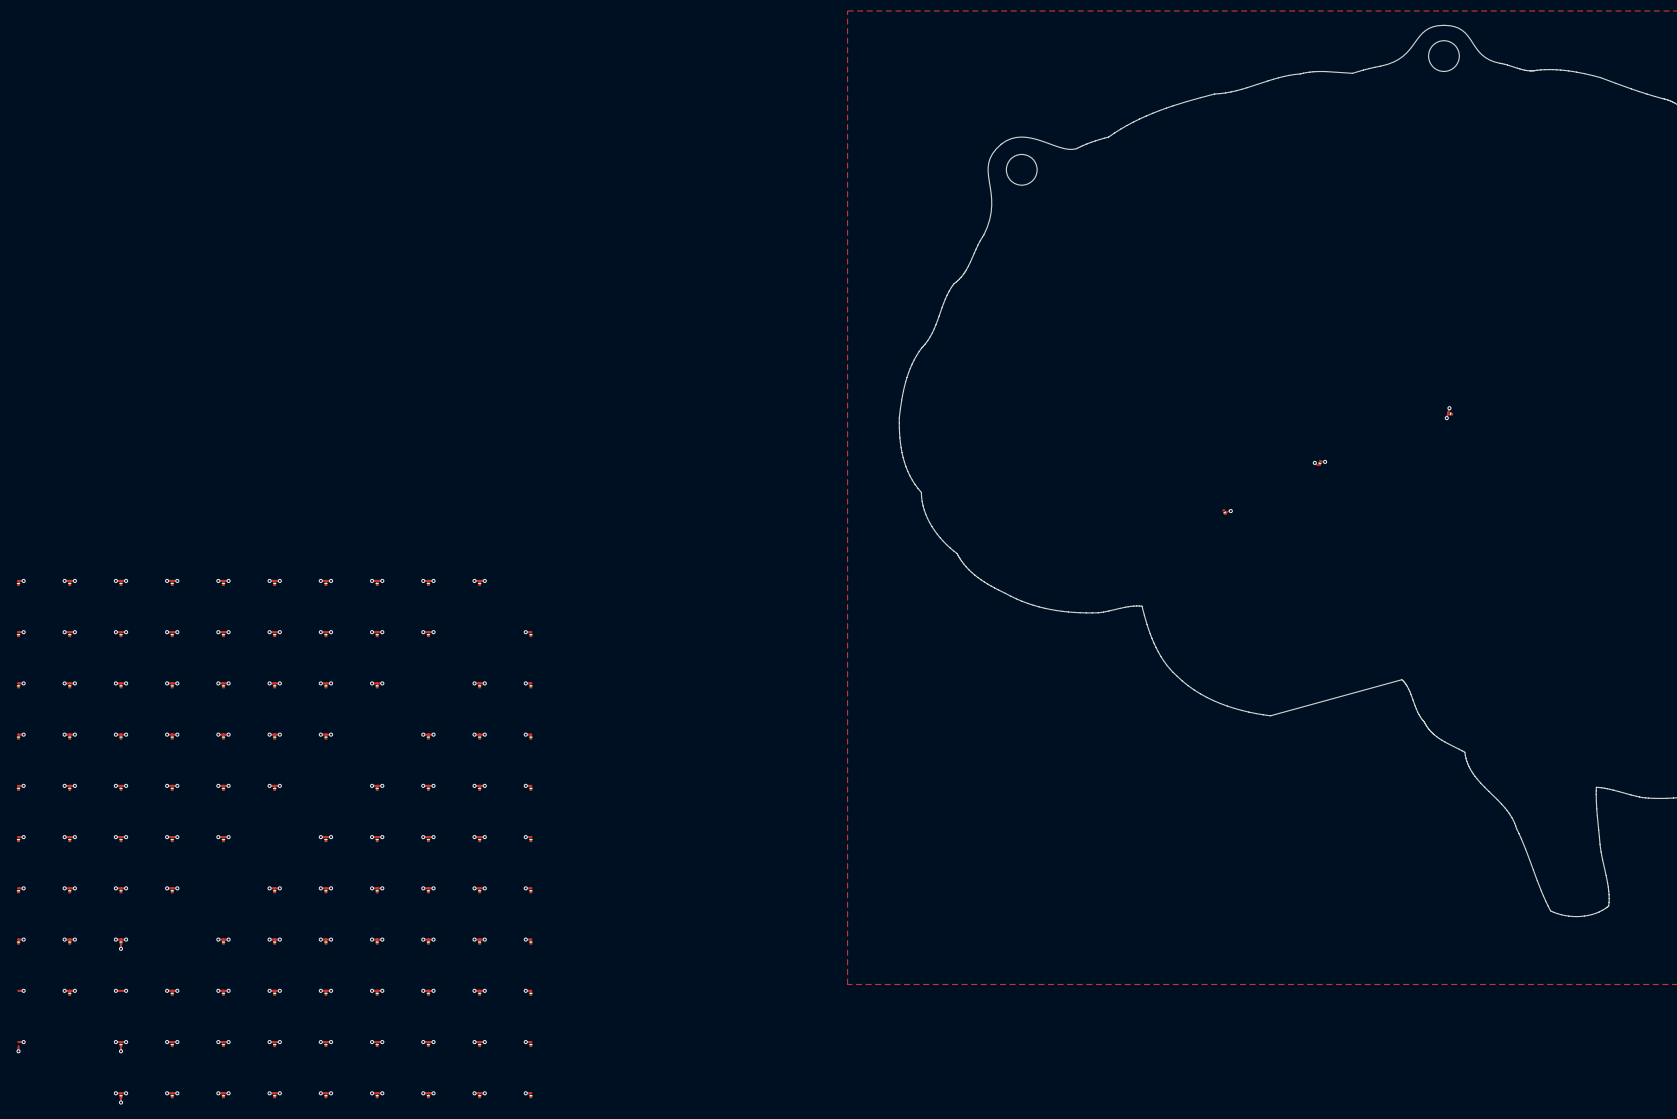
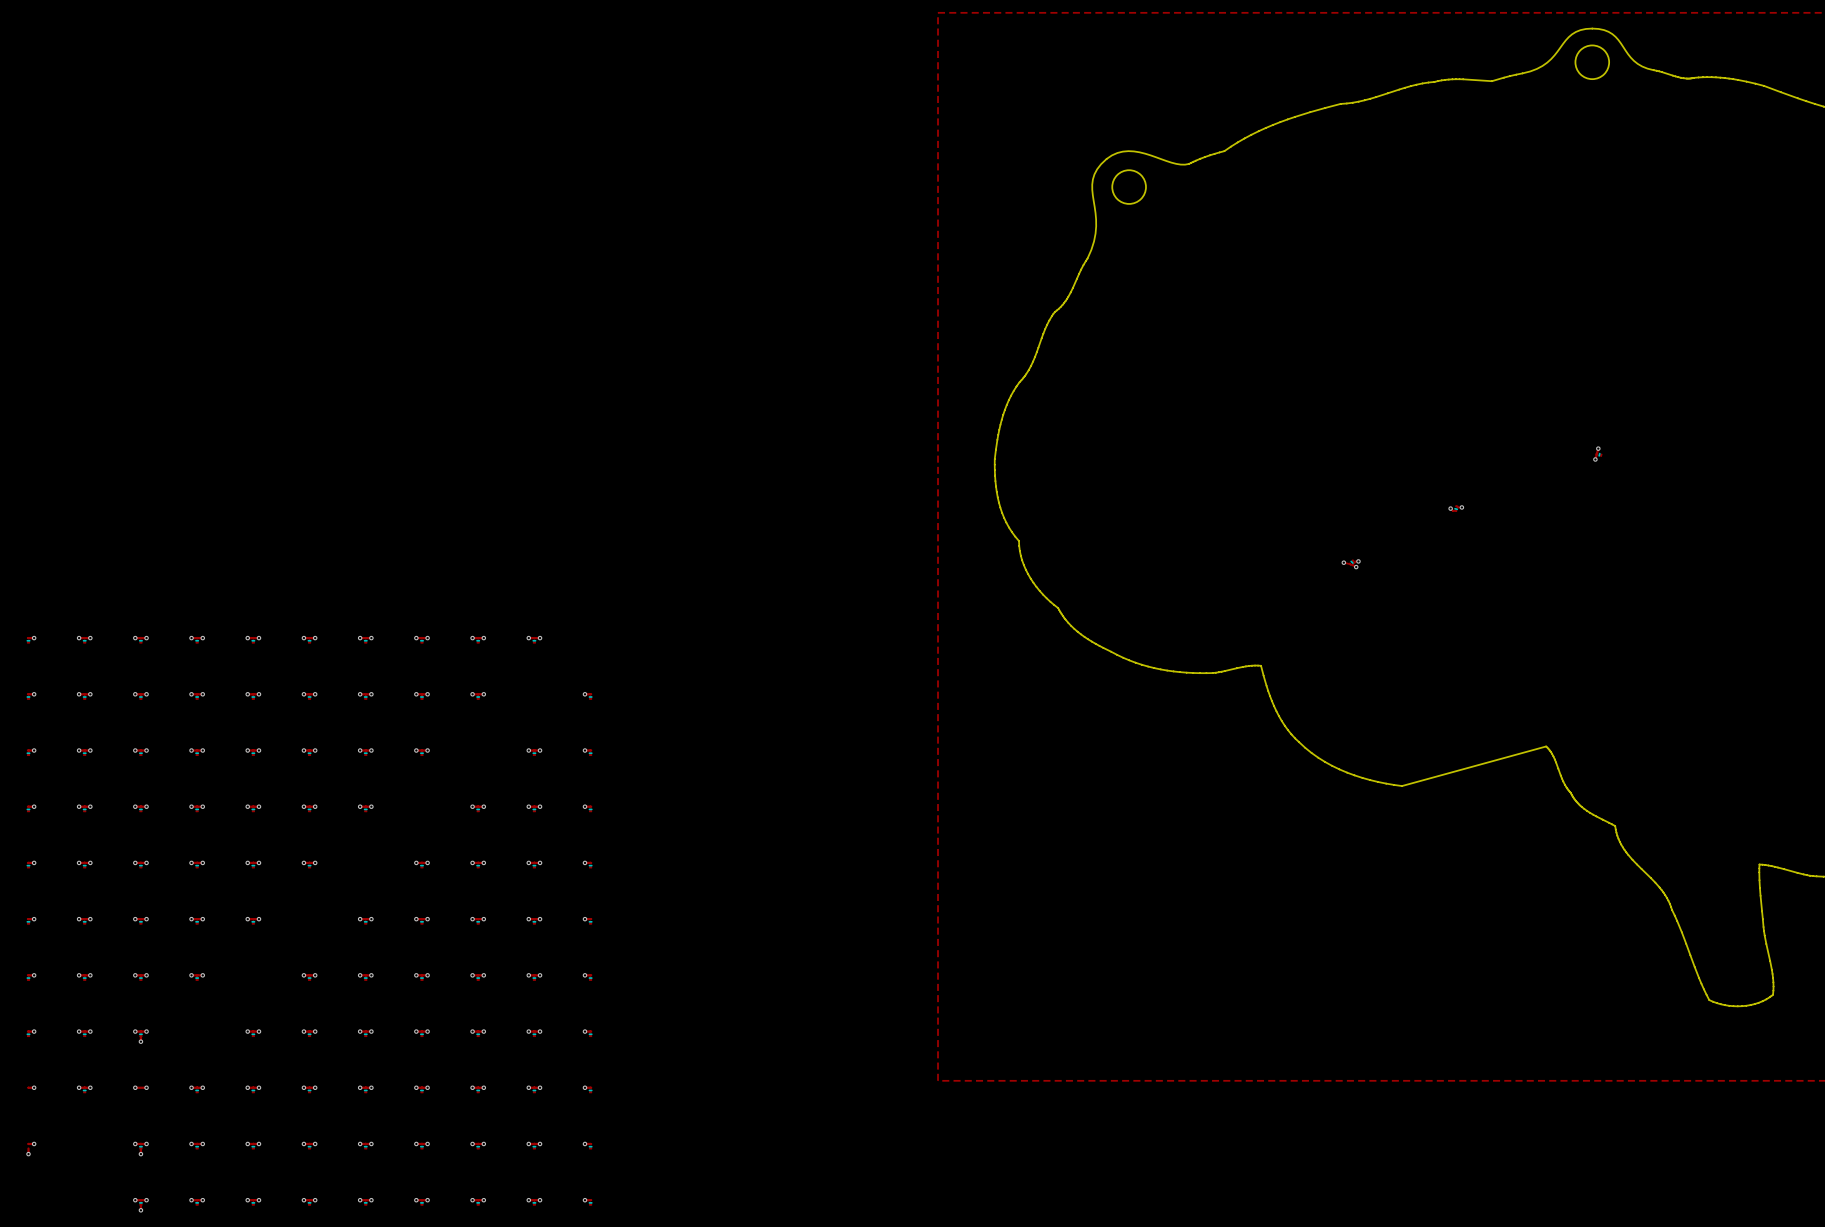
track: none -> (1343, 562) (1356, 567)
via: none -> (1343, 562)
part rotation: 0° (1224, 512) -> 105° counterclockwise (1351, 562)
via: none -> (1356, 567)

